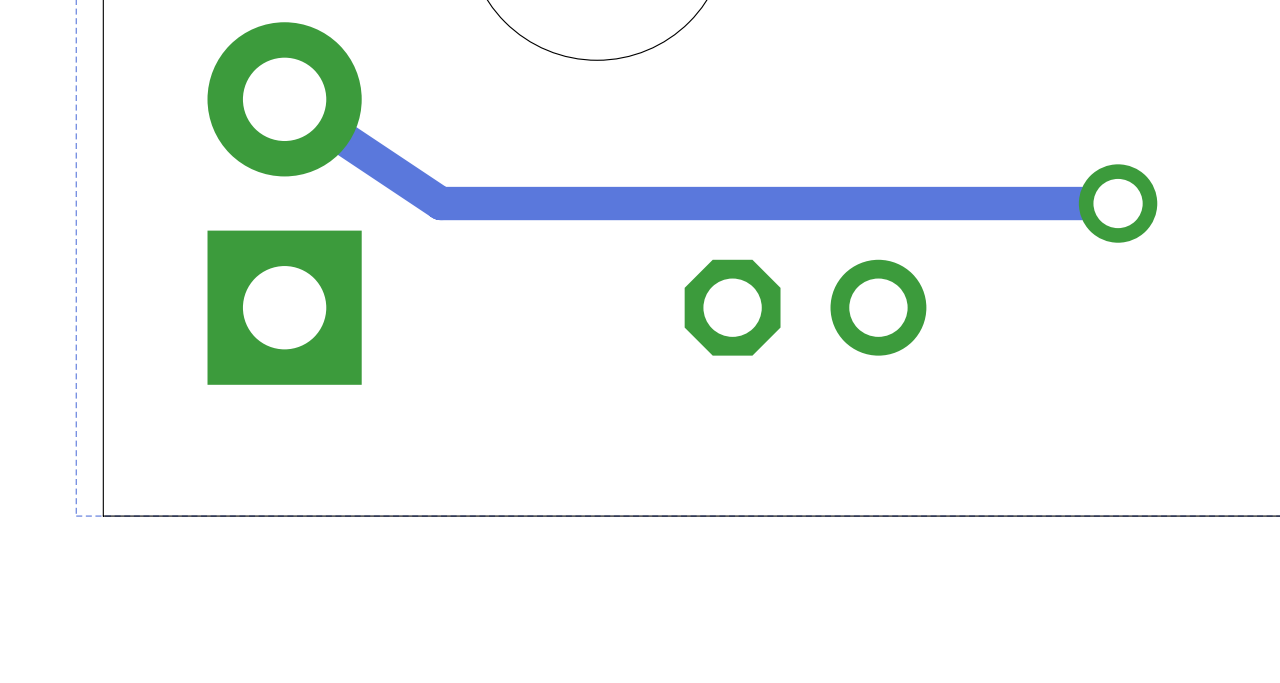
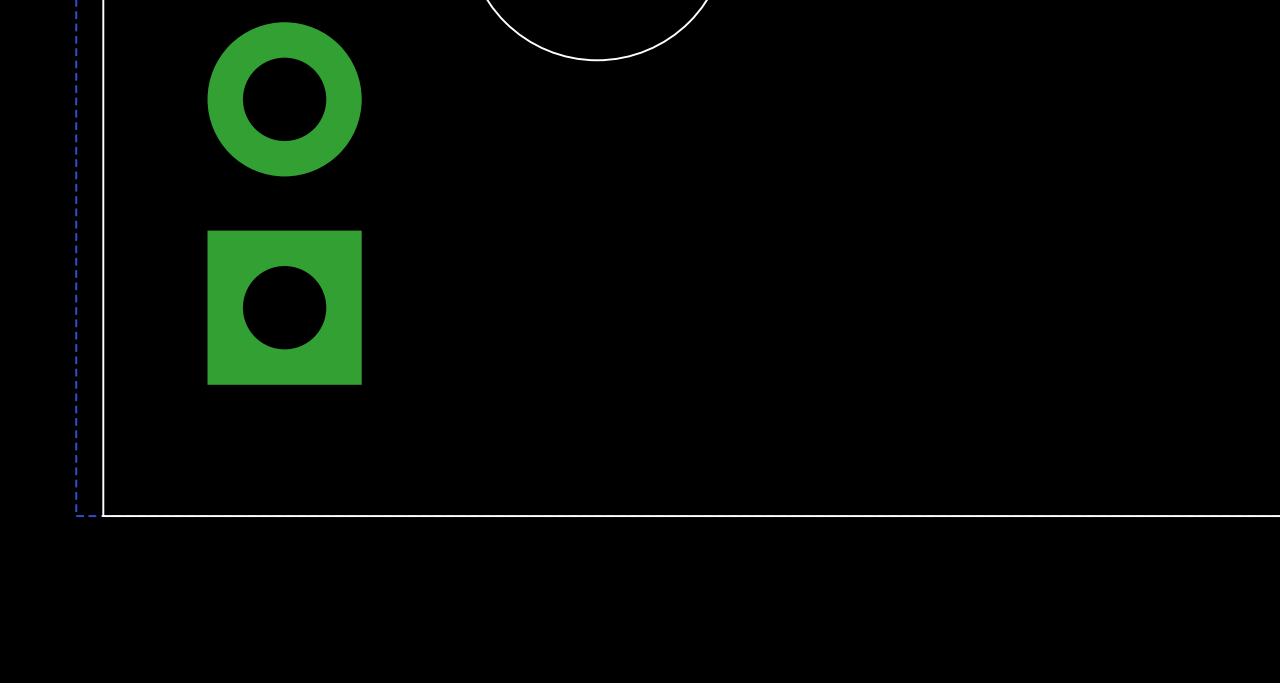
track: (284, 99) (440, 203) (1118, 203) -> none
via: (1118, 203) -> none
part: (805, 307) -> none

